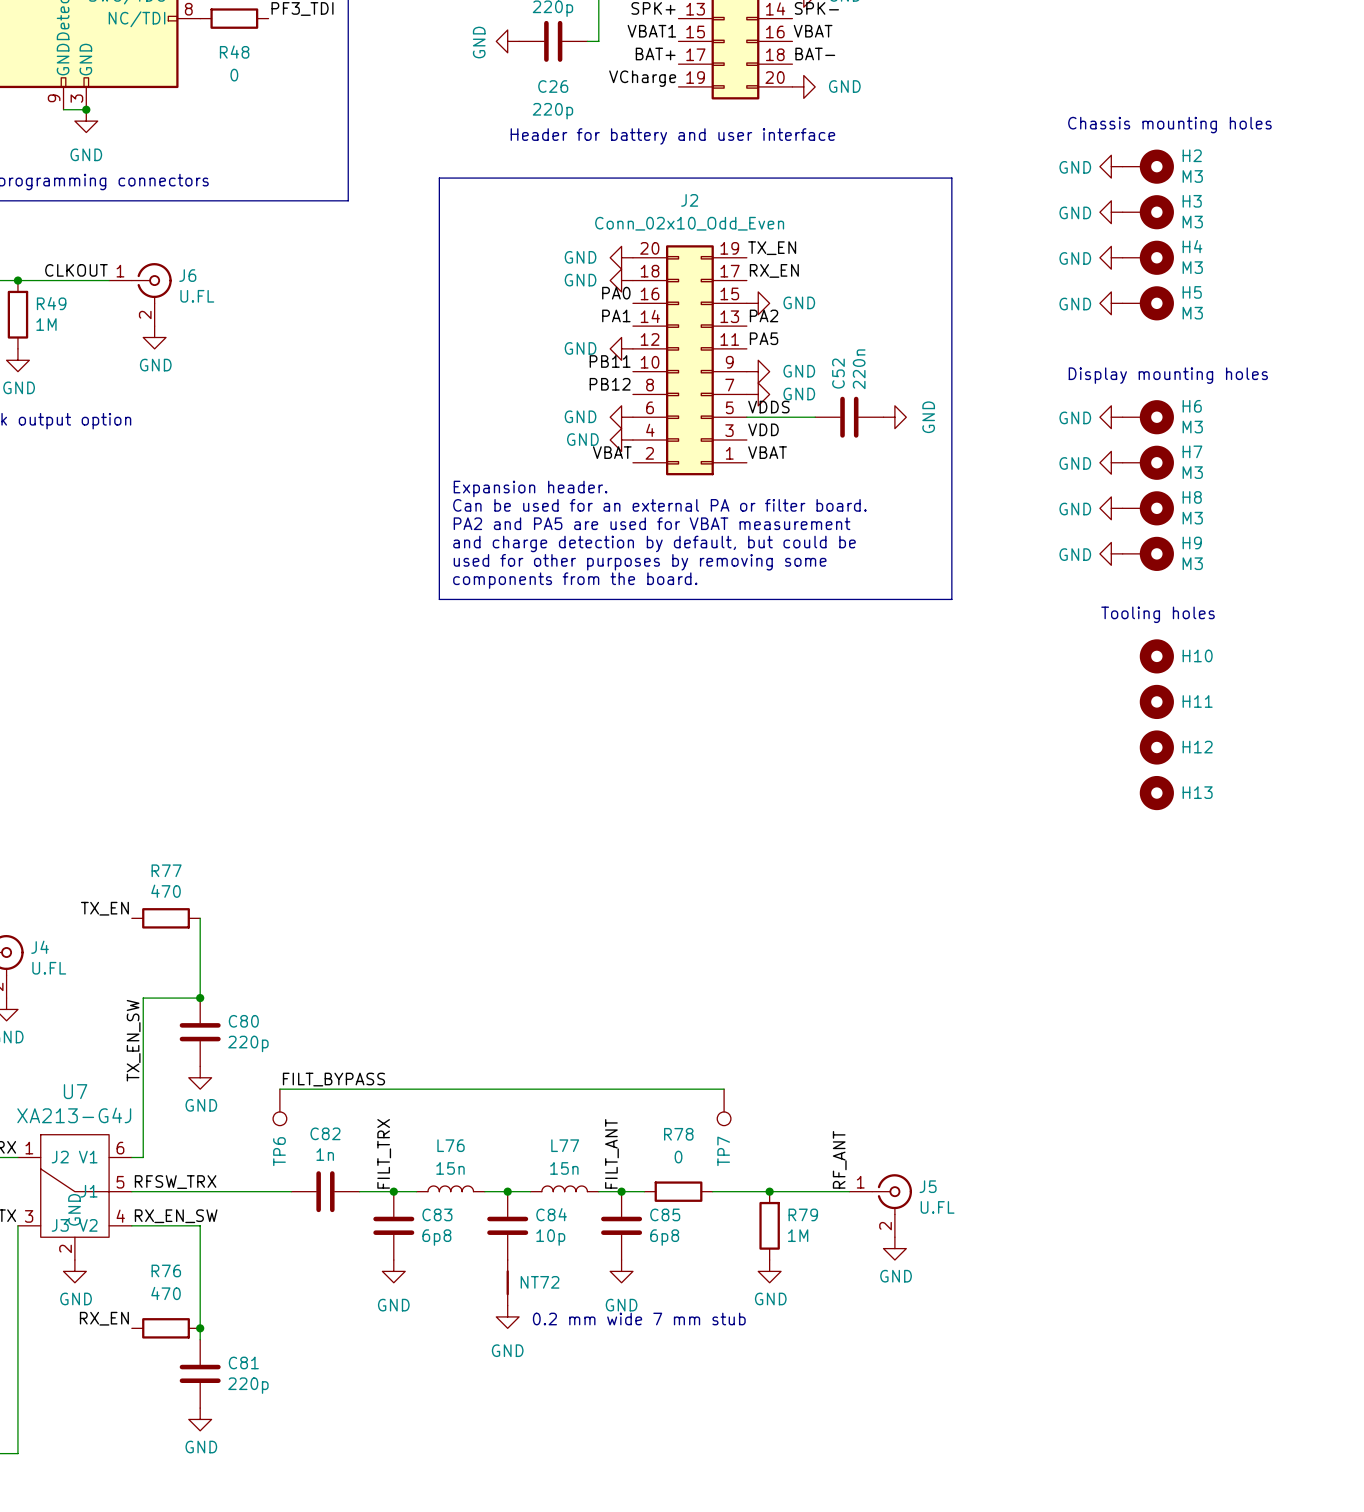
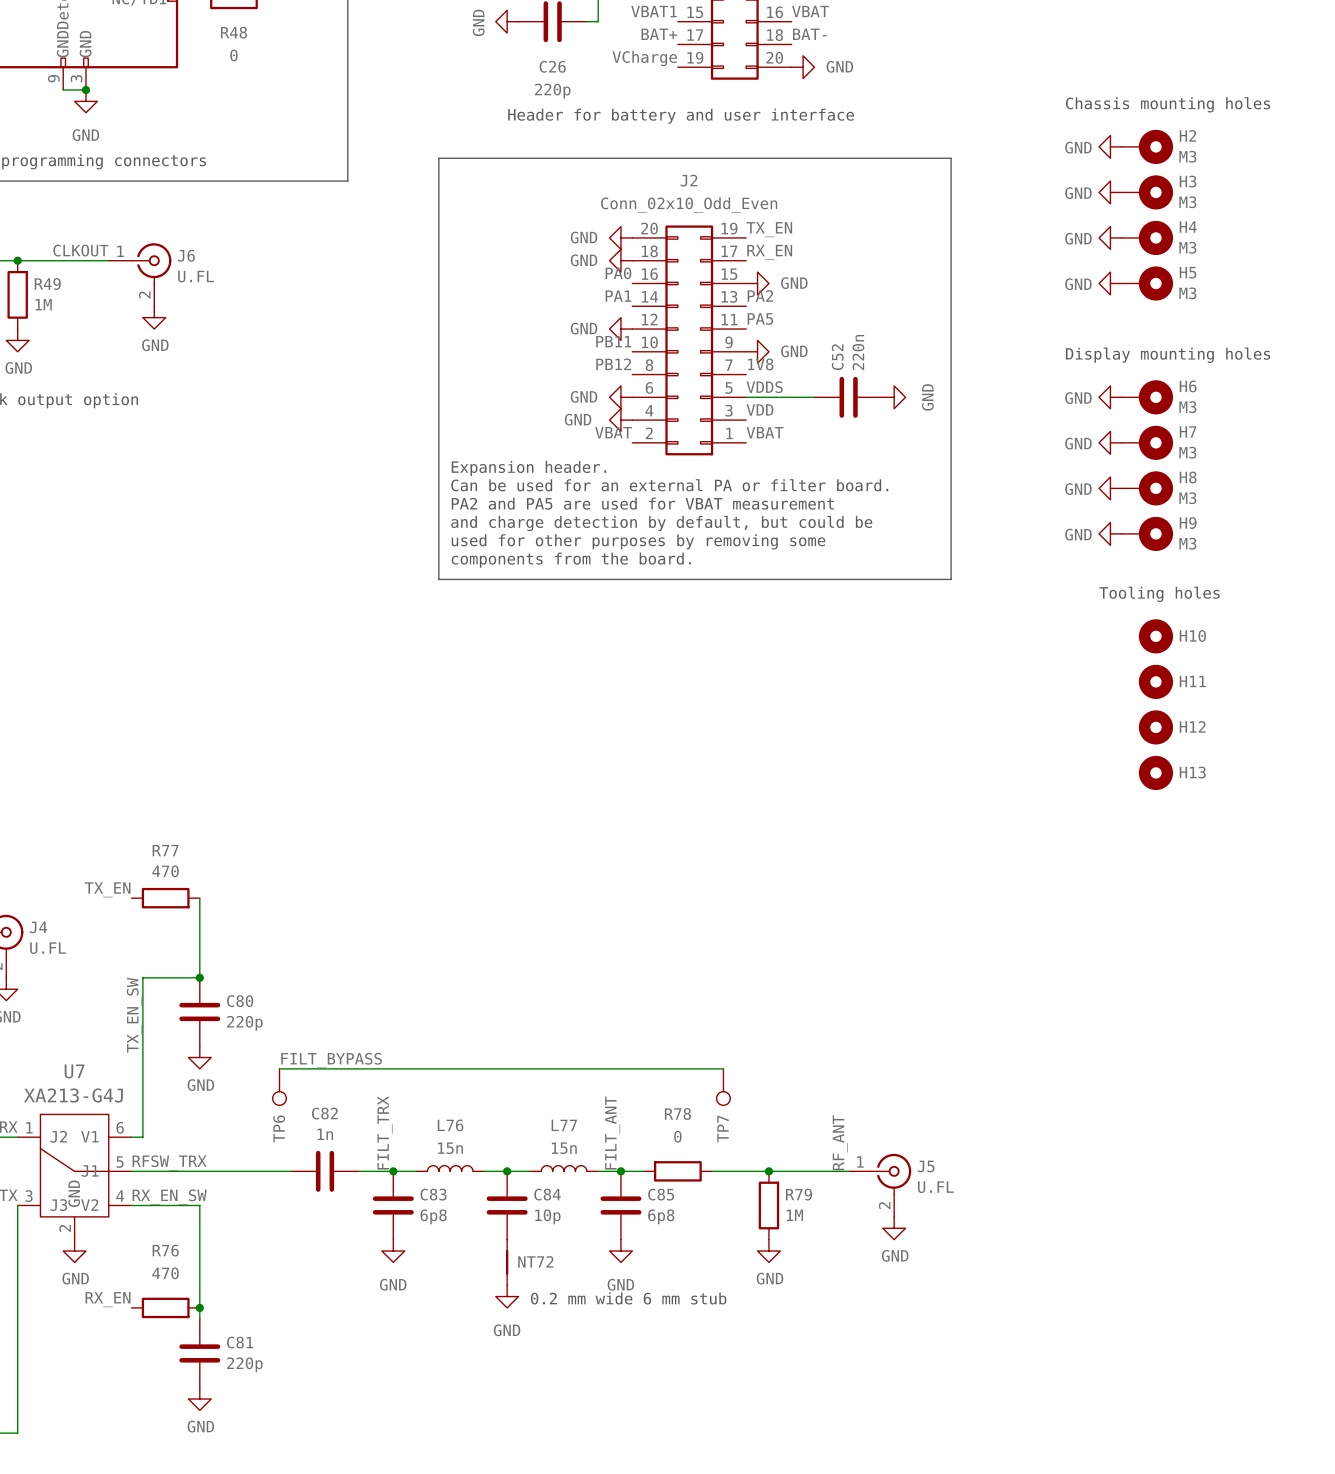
label: none -> 1V8 (760, 364)
power symbol: GND (758, 394) -> none
text: 0.2 mm wide 7 mm stub (639, 1319) -> 0.2 mm wide 6 mm stub (628, 1298)

